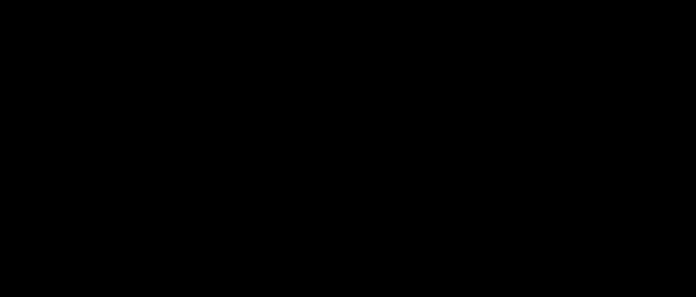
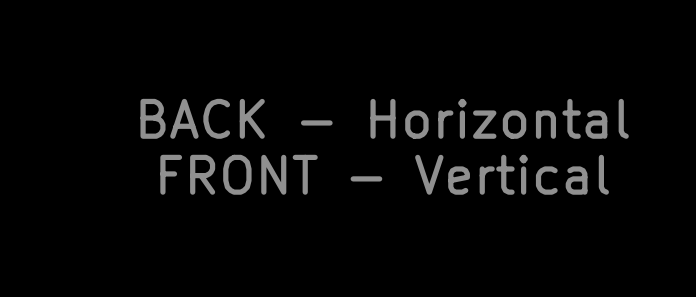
text: none -> BACK - Horizontal (384, 118)
text: none -> FRONT - Vertical (384, 174)

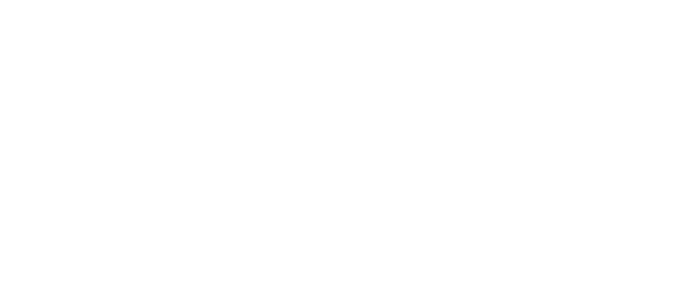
text: BACK - Horizontal (384, 118) -> none
text: FRONT - Vertical (384, 174) -> none

